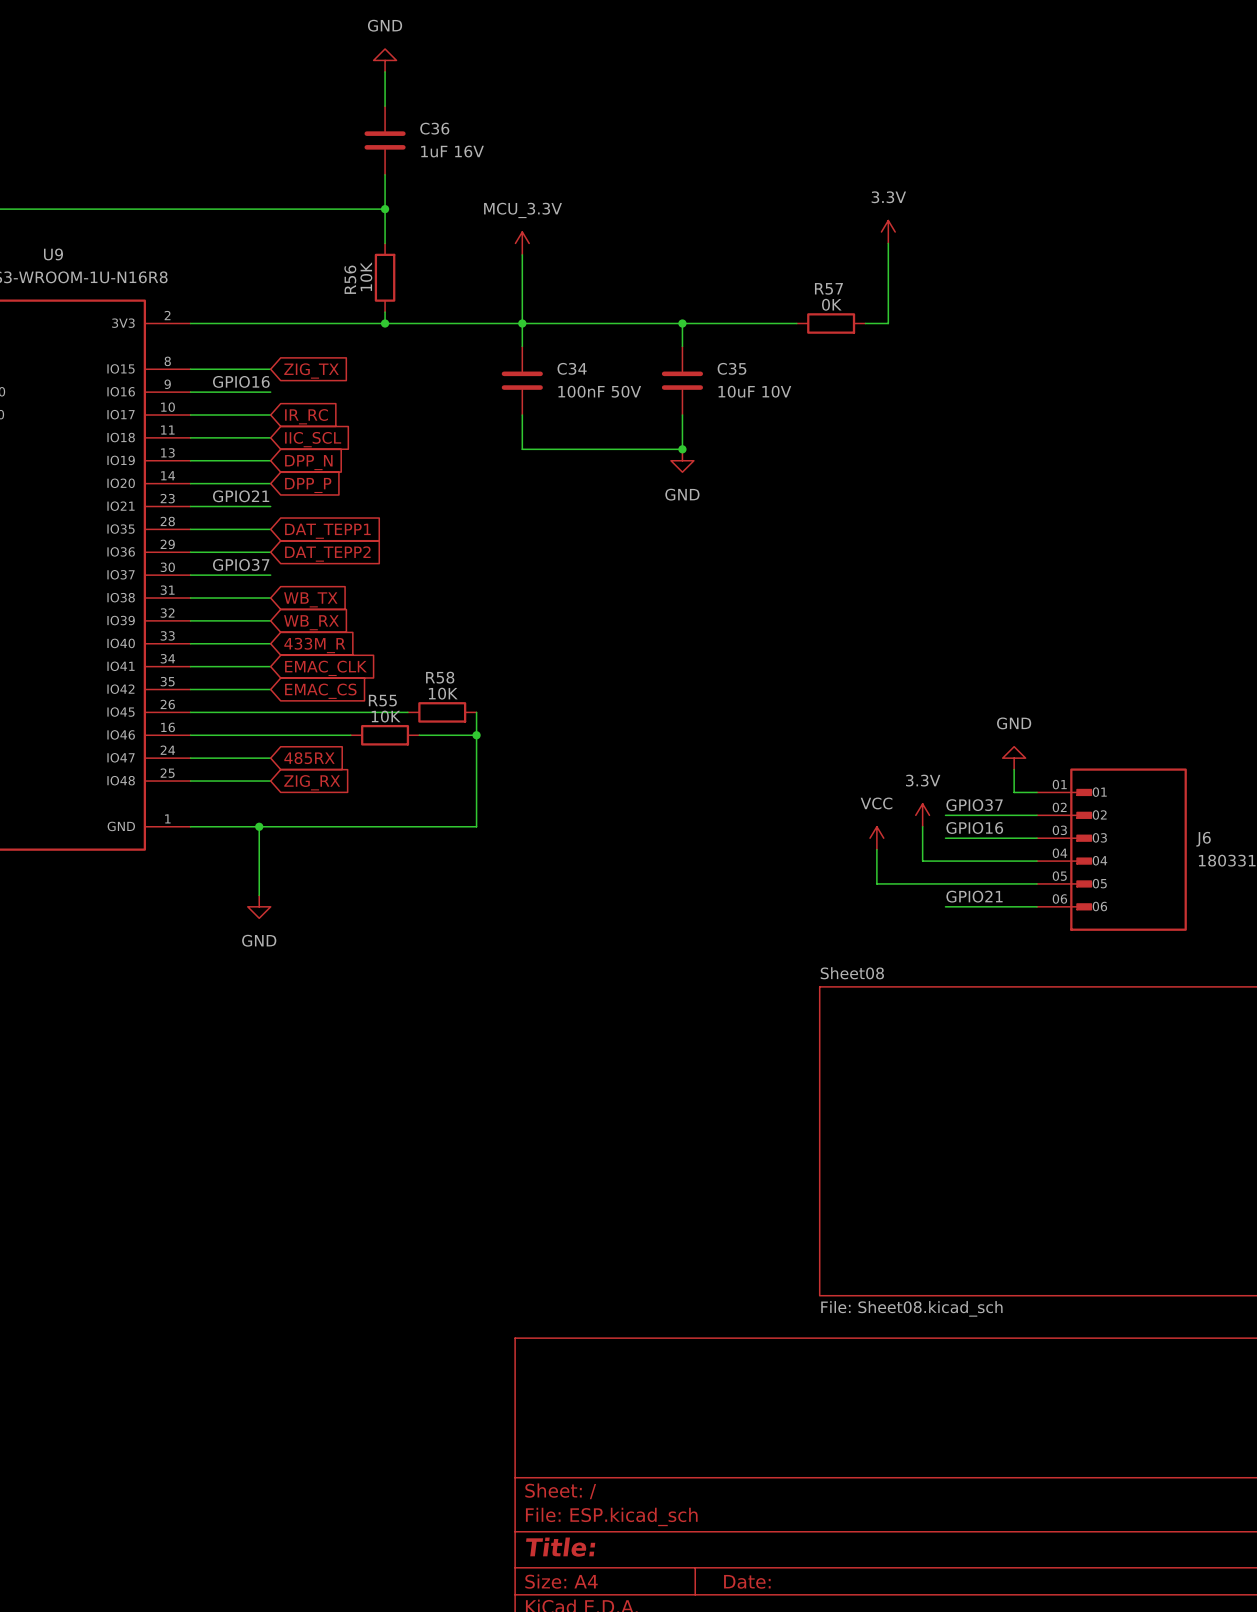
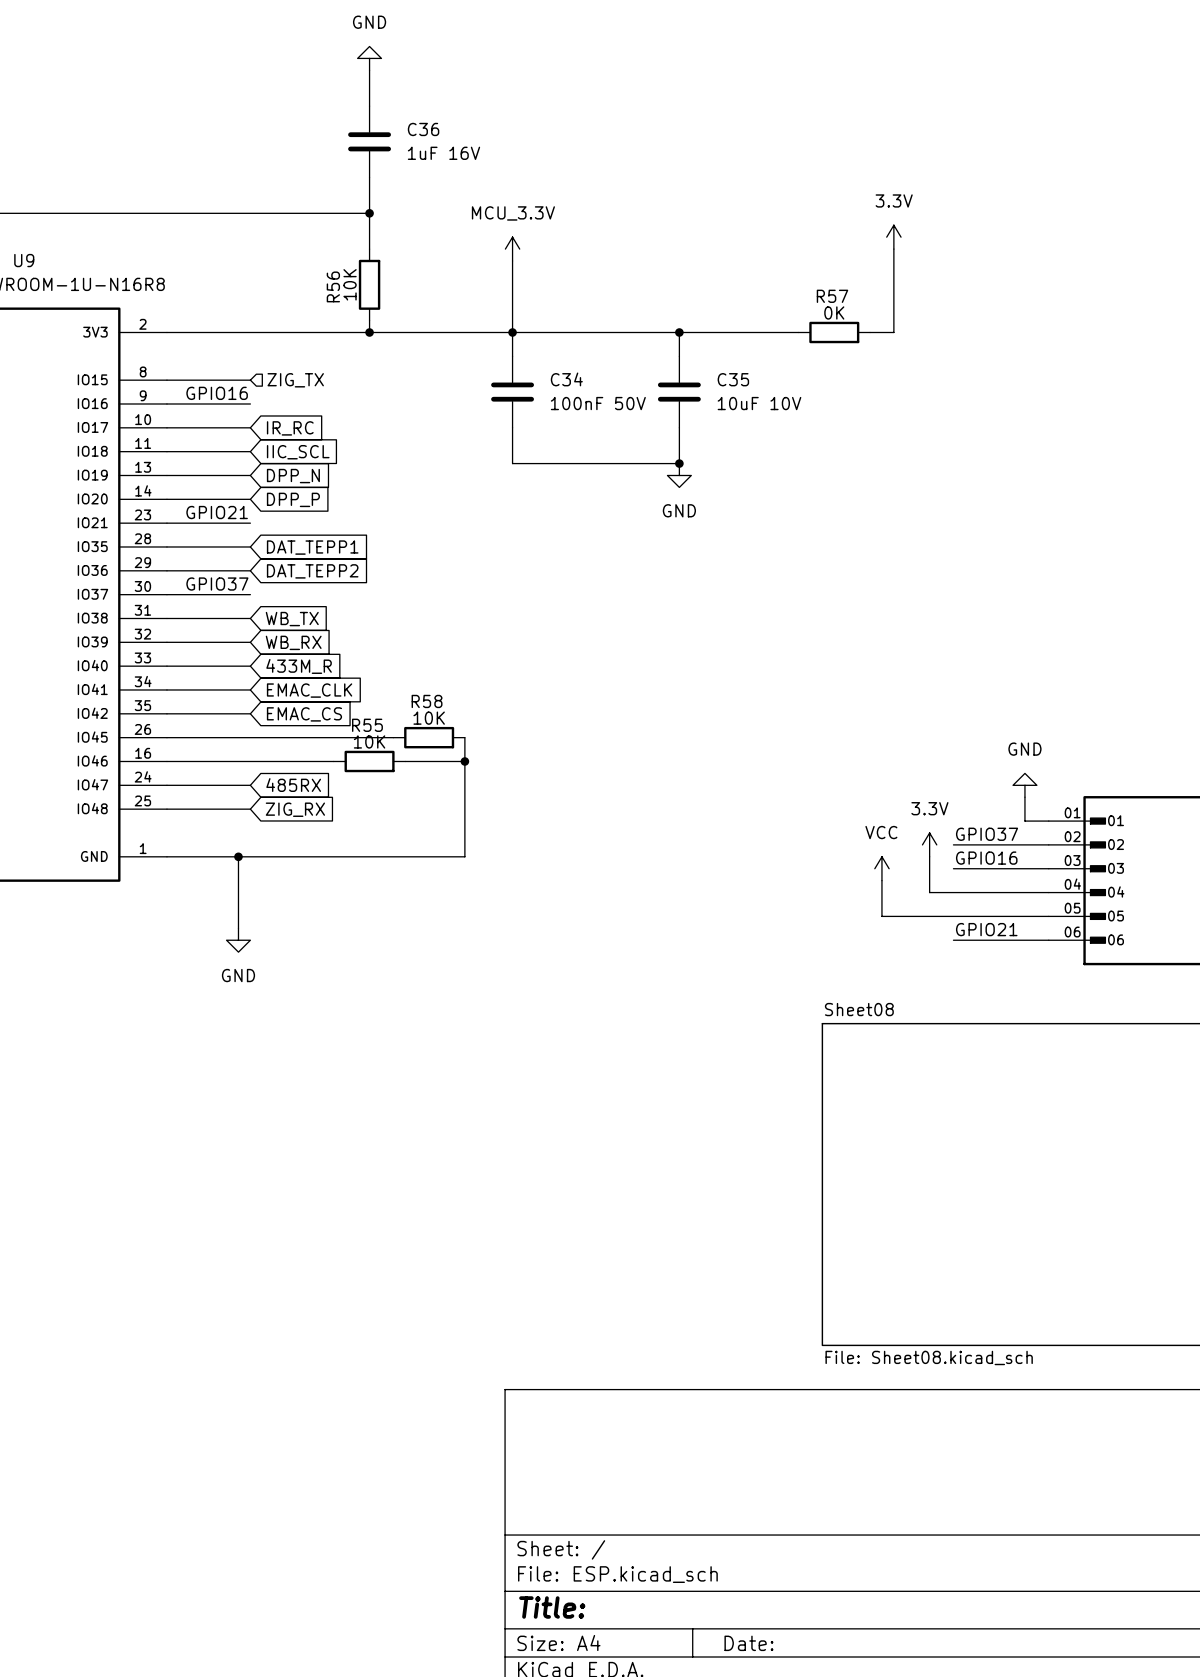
hierarchical label: none -> ZIG_TX (295, 380)
global label: ZIG_TX (311, 371) -> none

